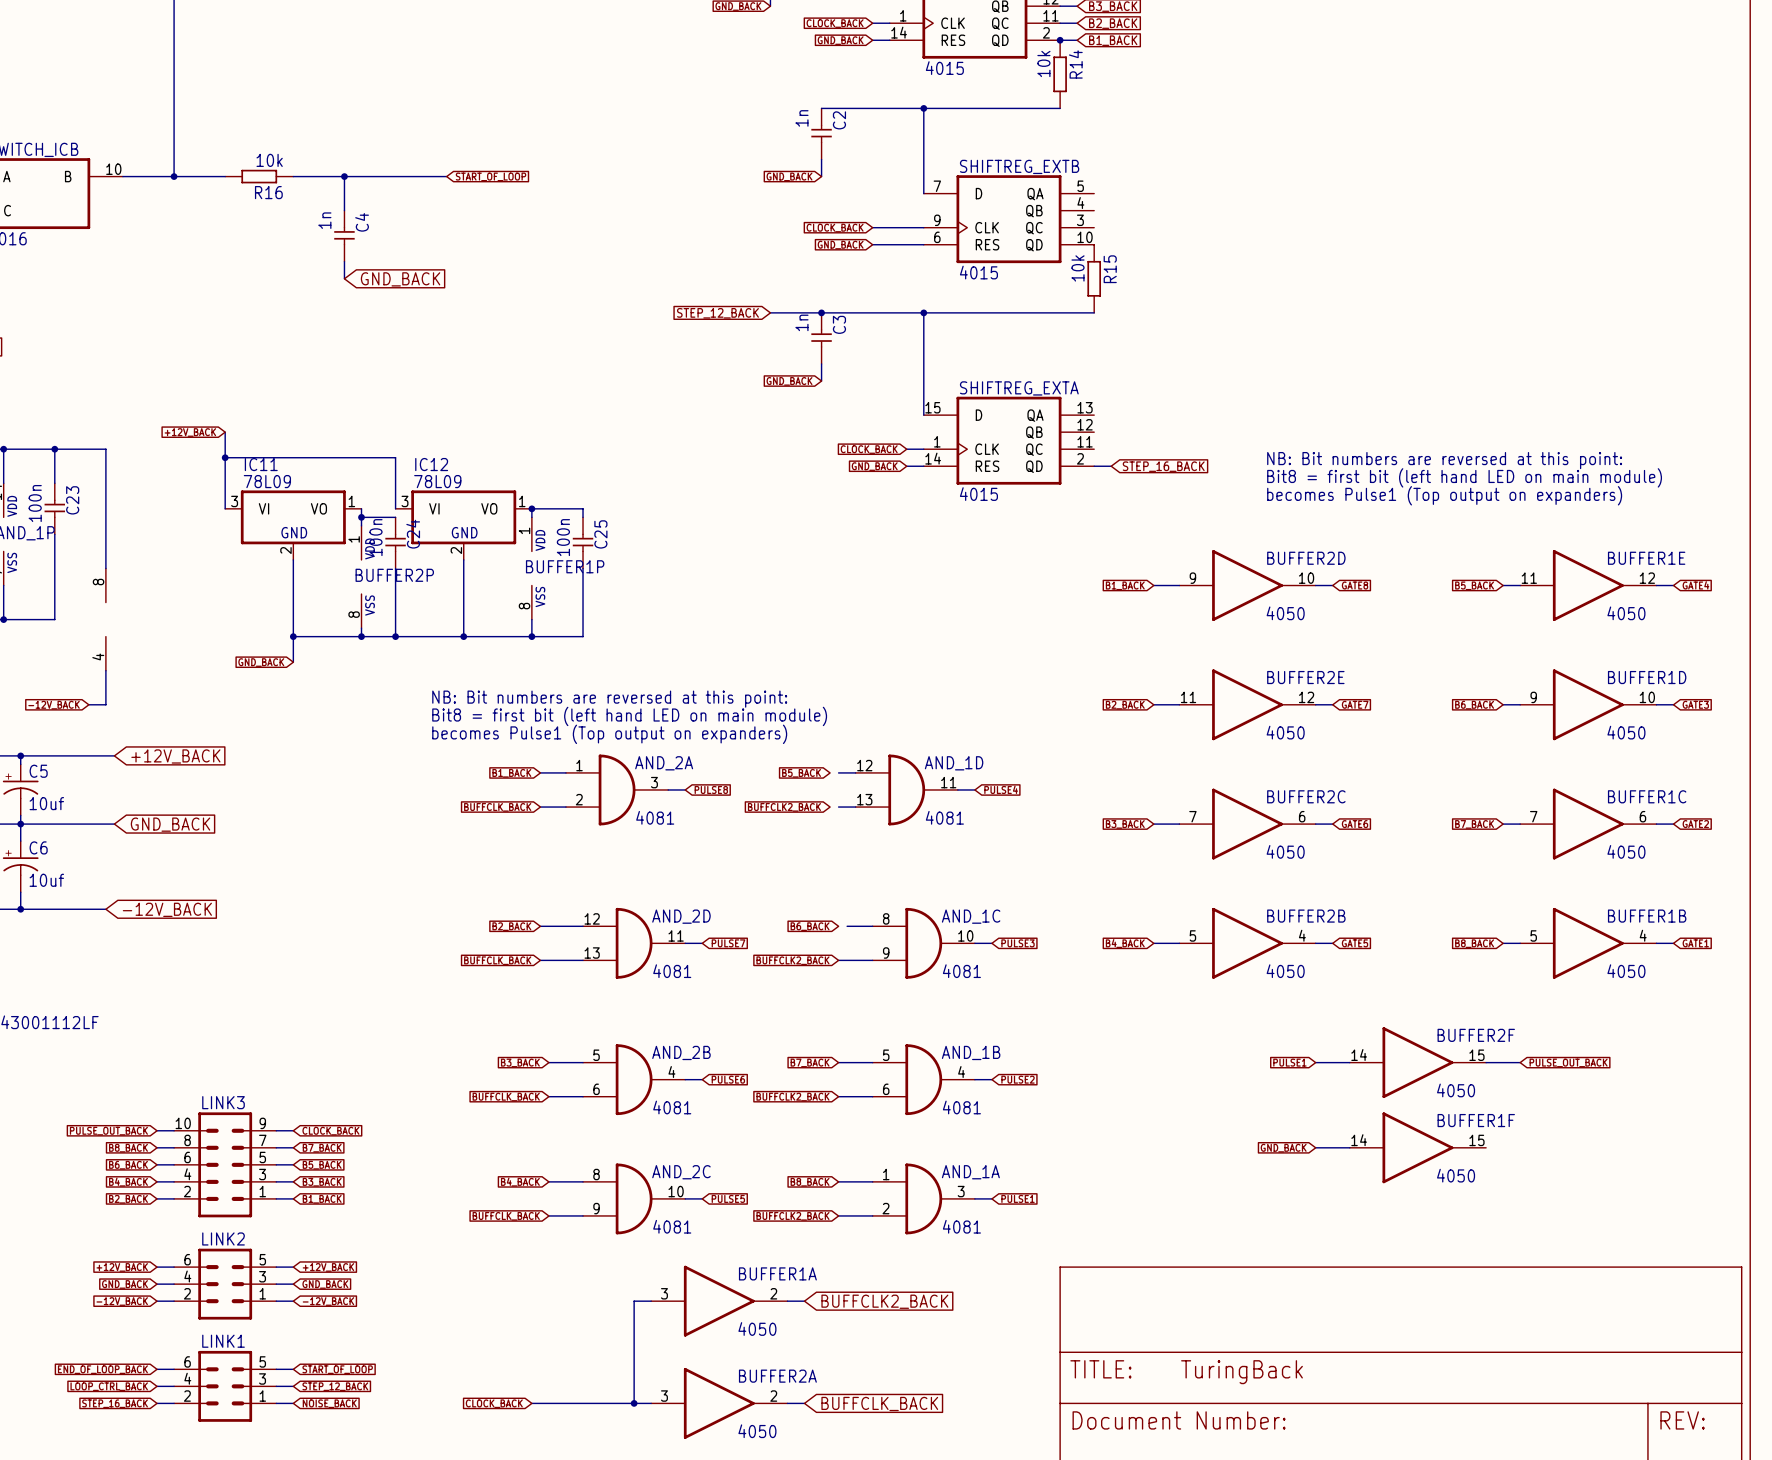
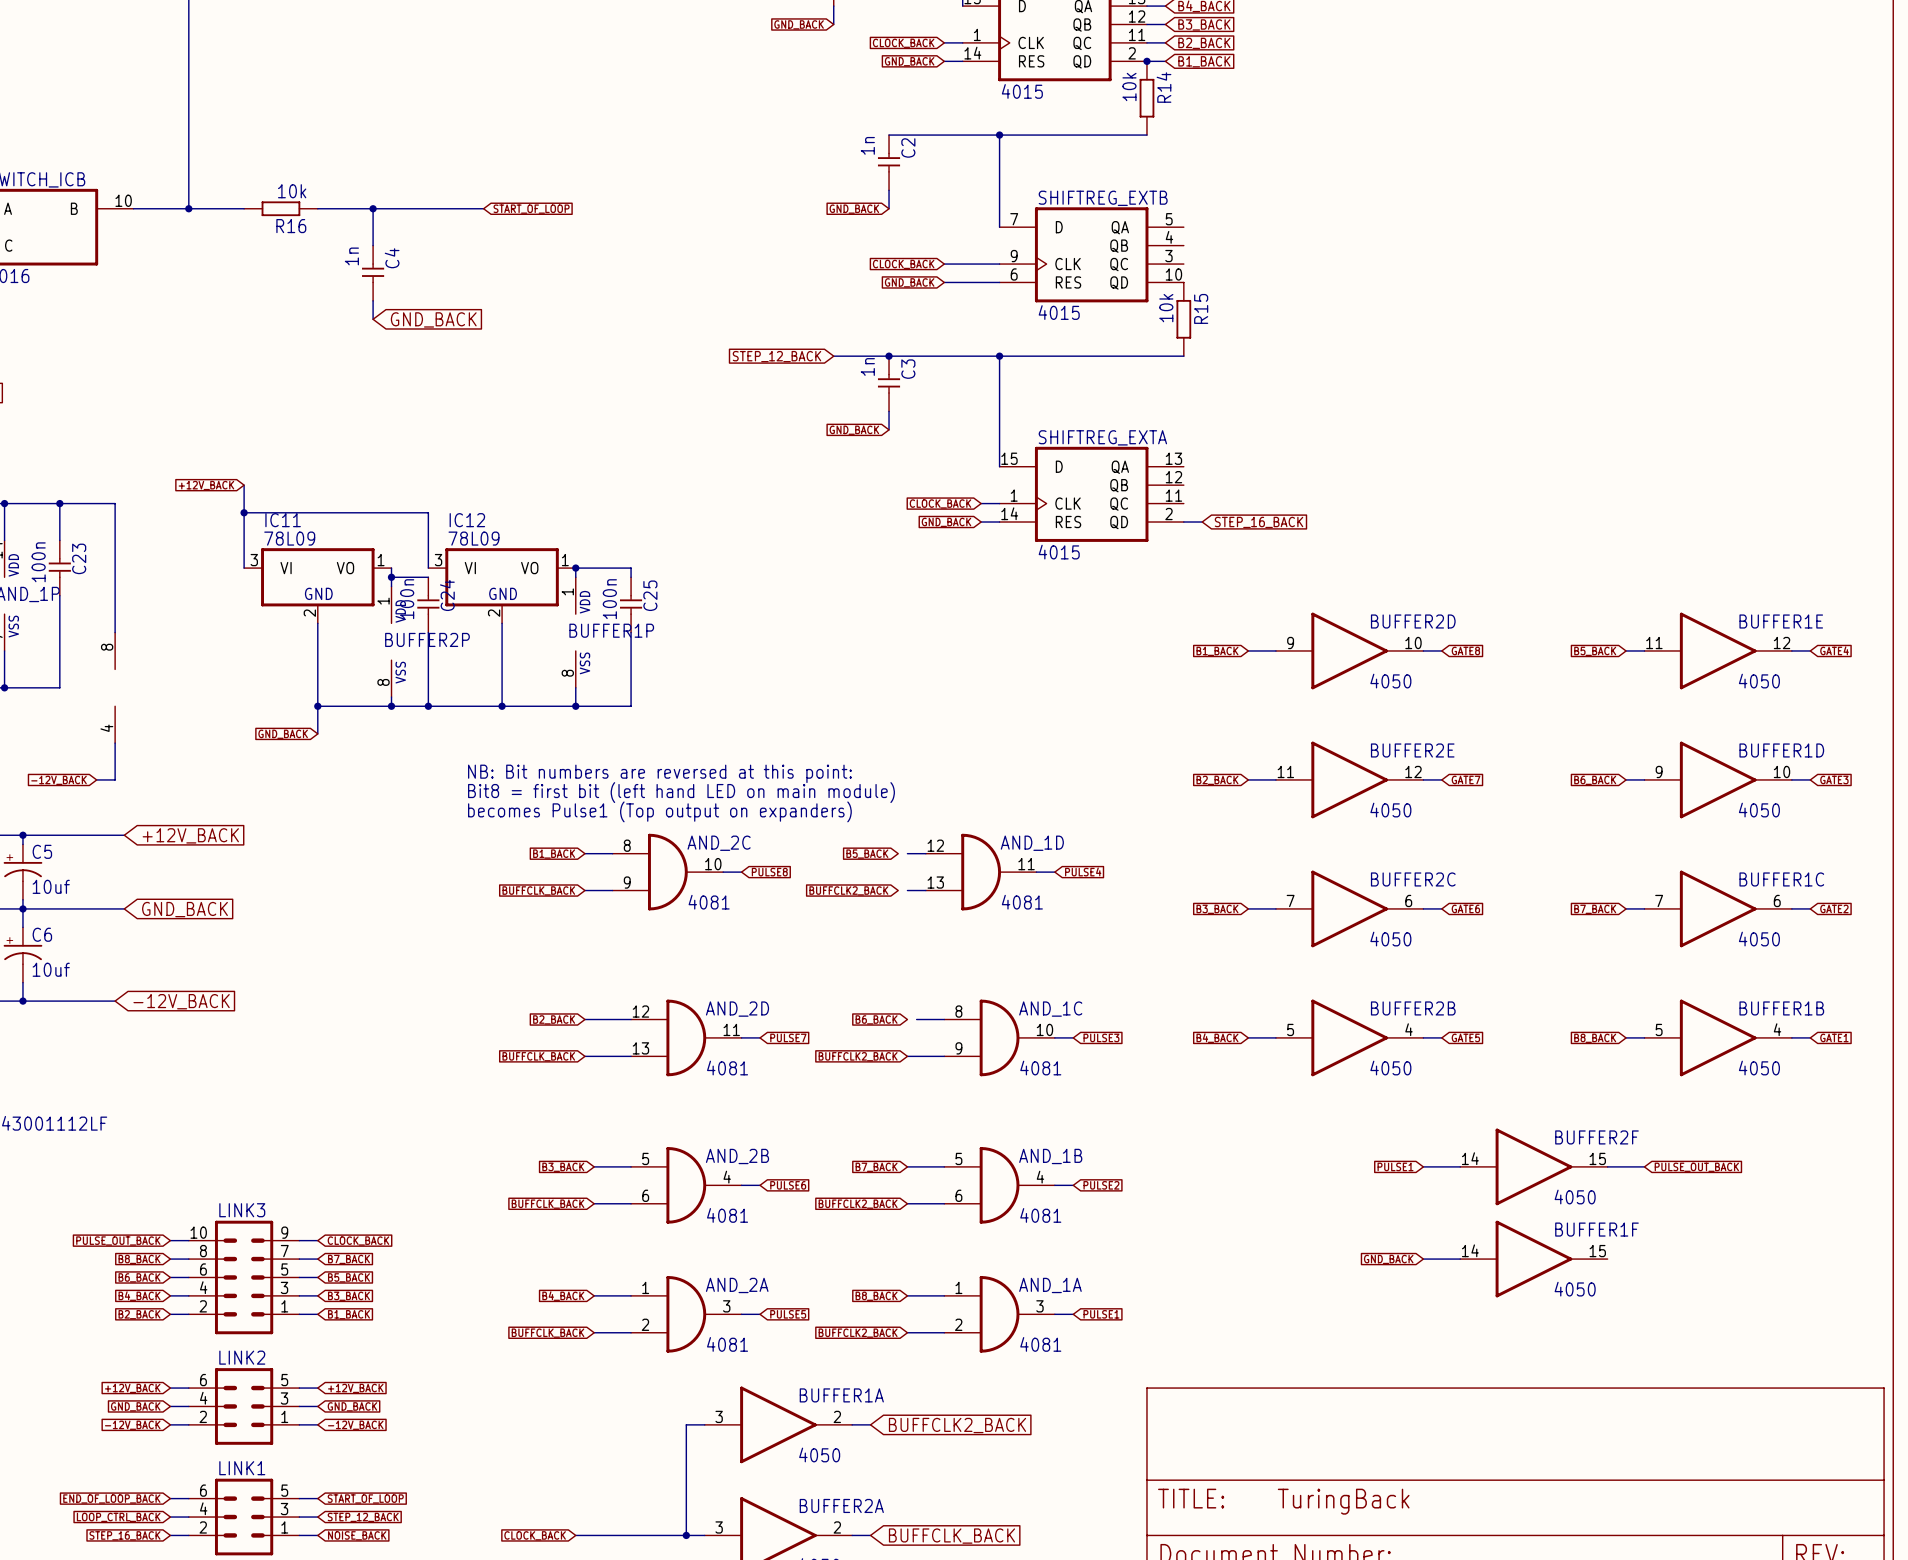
text: NB: Bit numbers are reversed at this point: (1444, 460) -> none
text: Bit8 = first bit (left hand LED on main module) (1464, 477) -> none
text: becomes Pulse1 (Top output on expanders) (1444, 495) -> none
AND_2A position: (617, 789) -> (686, 1314)
AND_2C position: (634, 1198) -> (667, 872)

